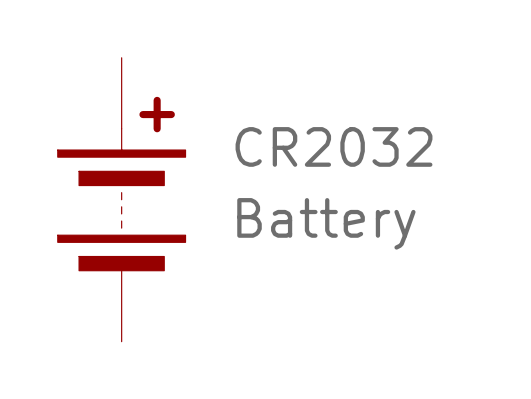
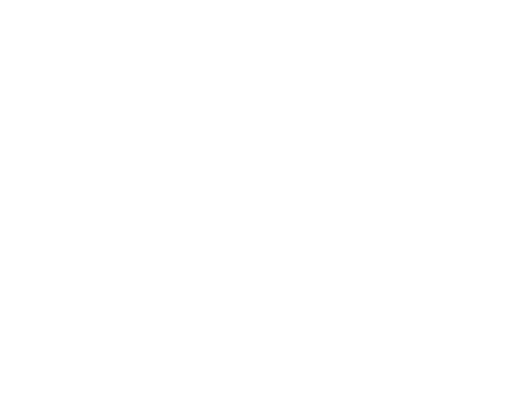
CR2032: Battery (121, 199) -> none

